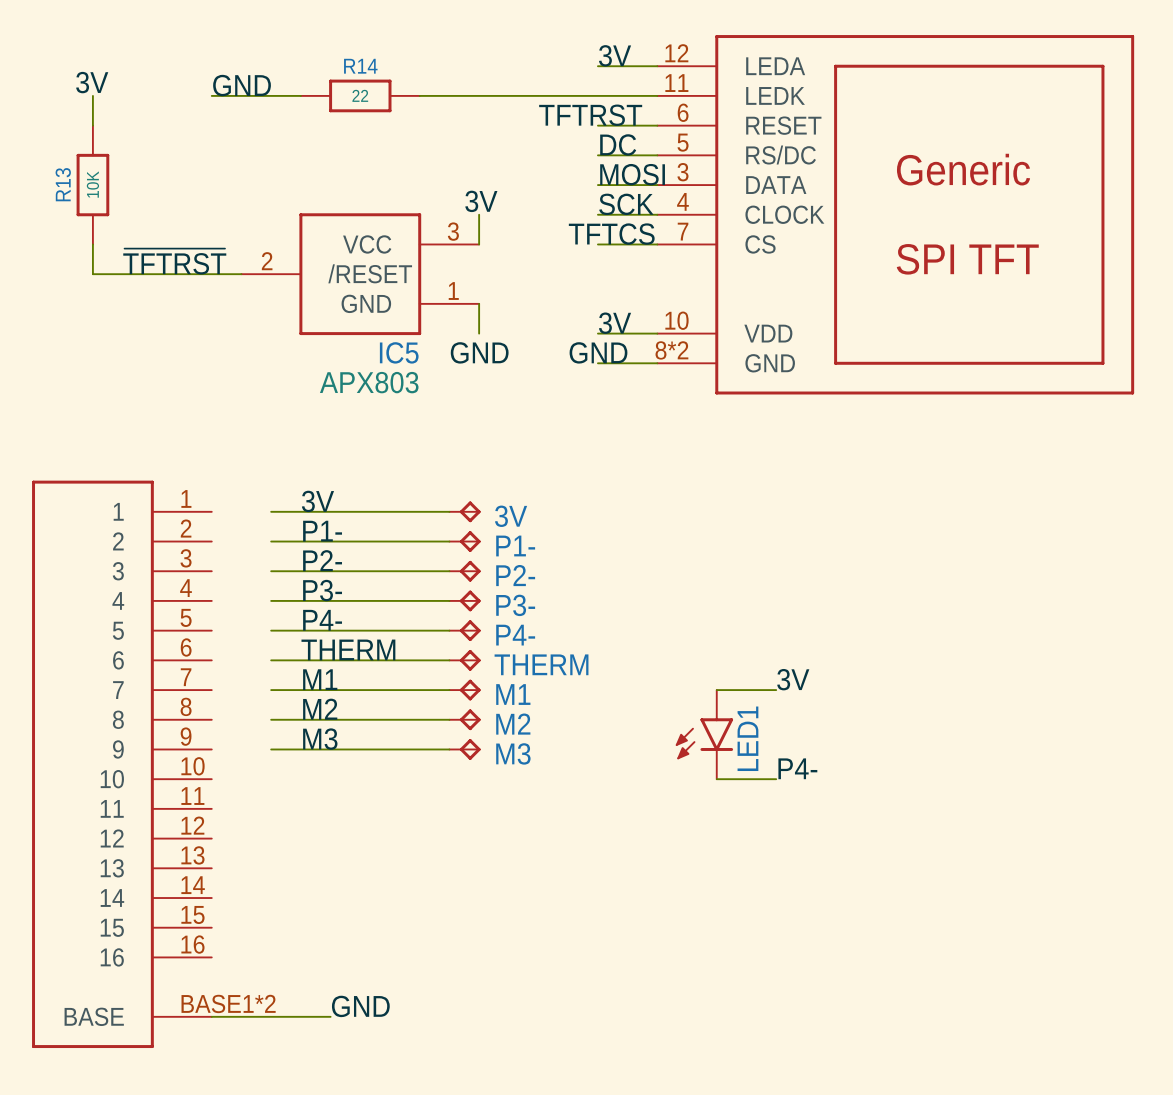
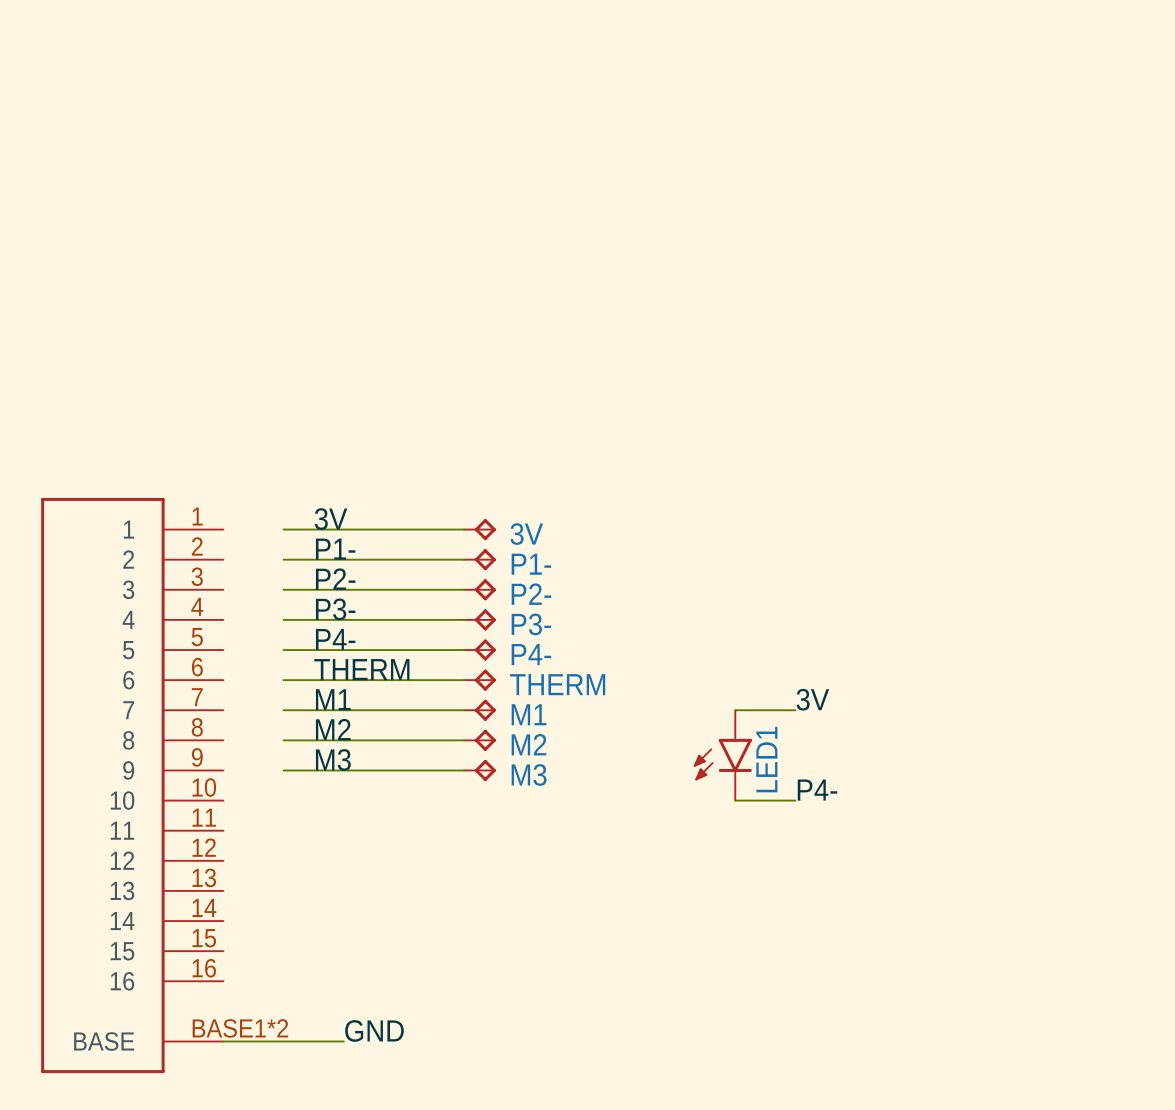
label: 3V (615, 55) -> none
wire: (597, 66) (657, 66) -> none
label: 3V (92, 82) -> none
label: GND (242, 85) -> none
wire: (92, 95) (92, 125) -> none
wire: (211, 95) (300, 95) -> none
R14: 22 (360, 95) -> none
wire: (419, 95) (657, 95) -> none
label: TFTRST (590, 115) -> none
wire: (597, 125) (657, 125) -> none
label: DC (618, 144) -> none
wire: (597, 155) (657, 155) -> none
label: MOSI (632, 174) -> none
R13: 10K (92, 185) -> none
wire: (597, 185) (657, 185) -> none
label: 3V (481, 201) -> none
label: SCK (626, 204) -> none
wire: (479, 214) (479, 244) -> none
wire: (597, 214) (657, 214) -> none
part: (895, 214) -> none
label: TFTCS (611, 234) -> none
wire: (92, 244) (92, 274) (241, 274) -> none
wire: (597, 244) (657, 244) -> none
label: ~{TFTRST} (174, 261) -> none
IC5: APX803 (360, 274) -> none
wire: (479, 303) (479, 333) -> none
label: 3V (615, 323) -> none
wire: (597, 333) (657, 333) -> none
label: GND (479, 352) -> none
label: GND (598, 352) -> none
wire: (597, 363) (657, 363) -> none

